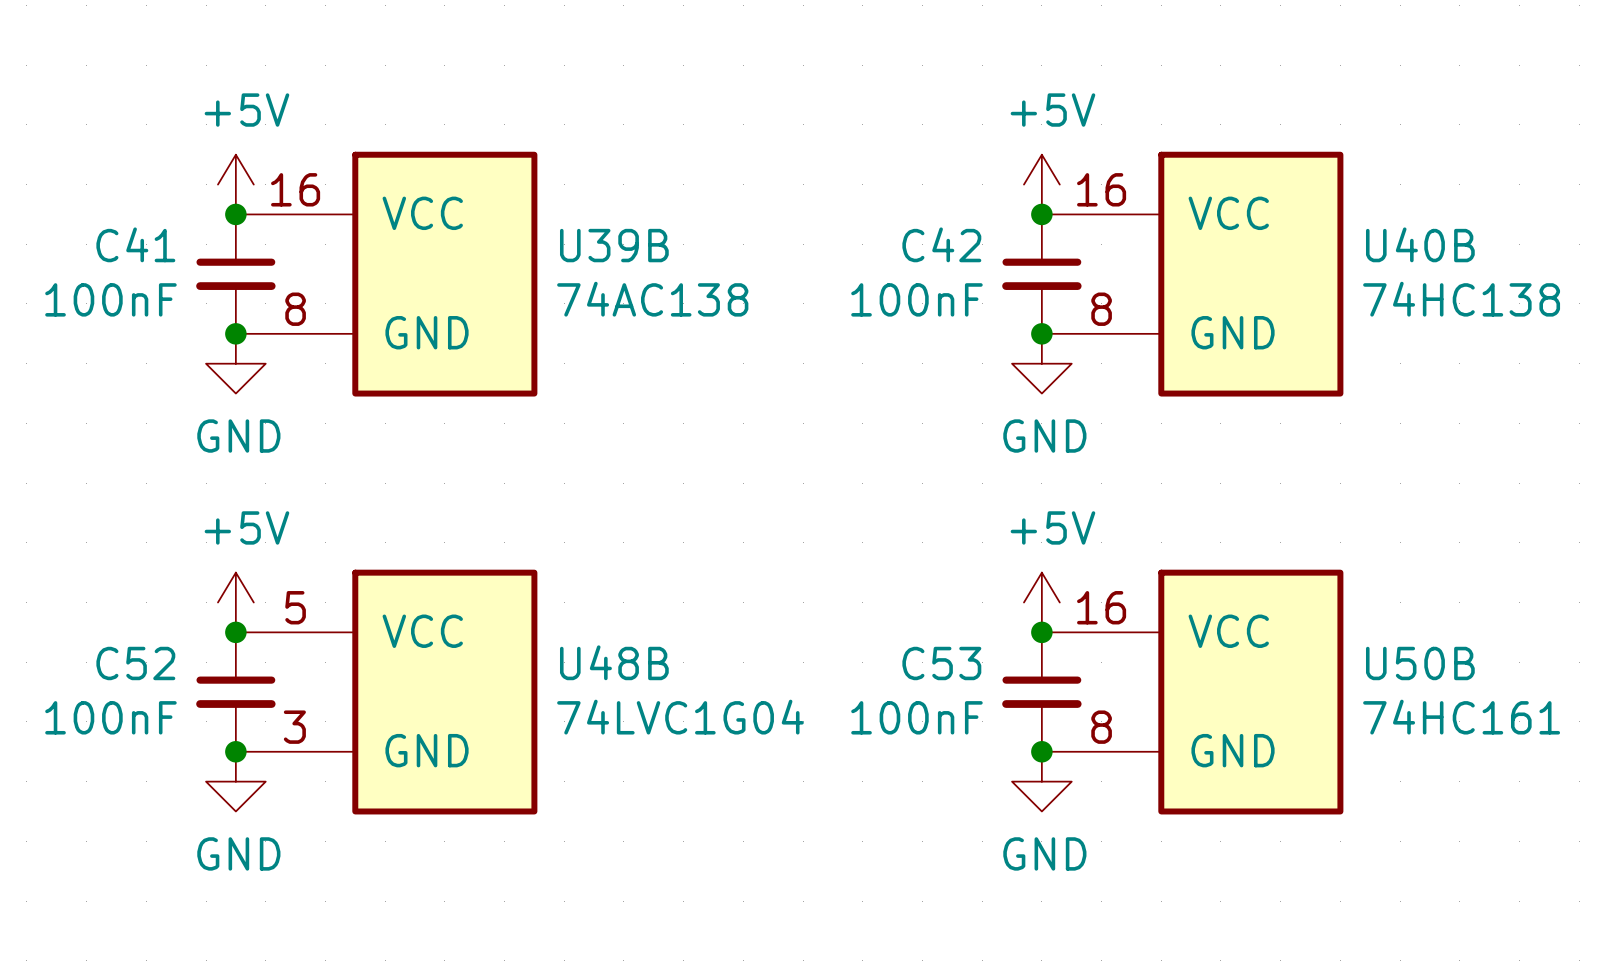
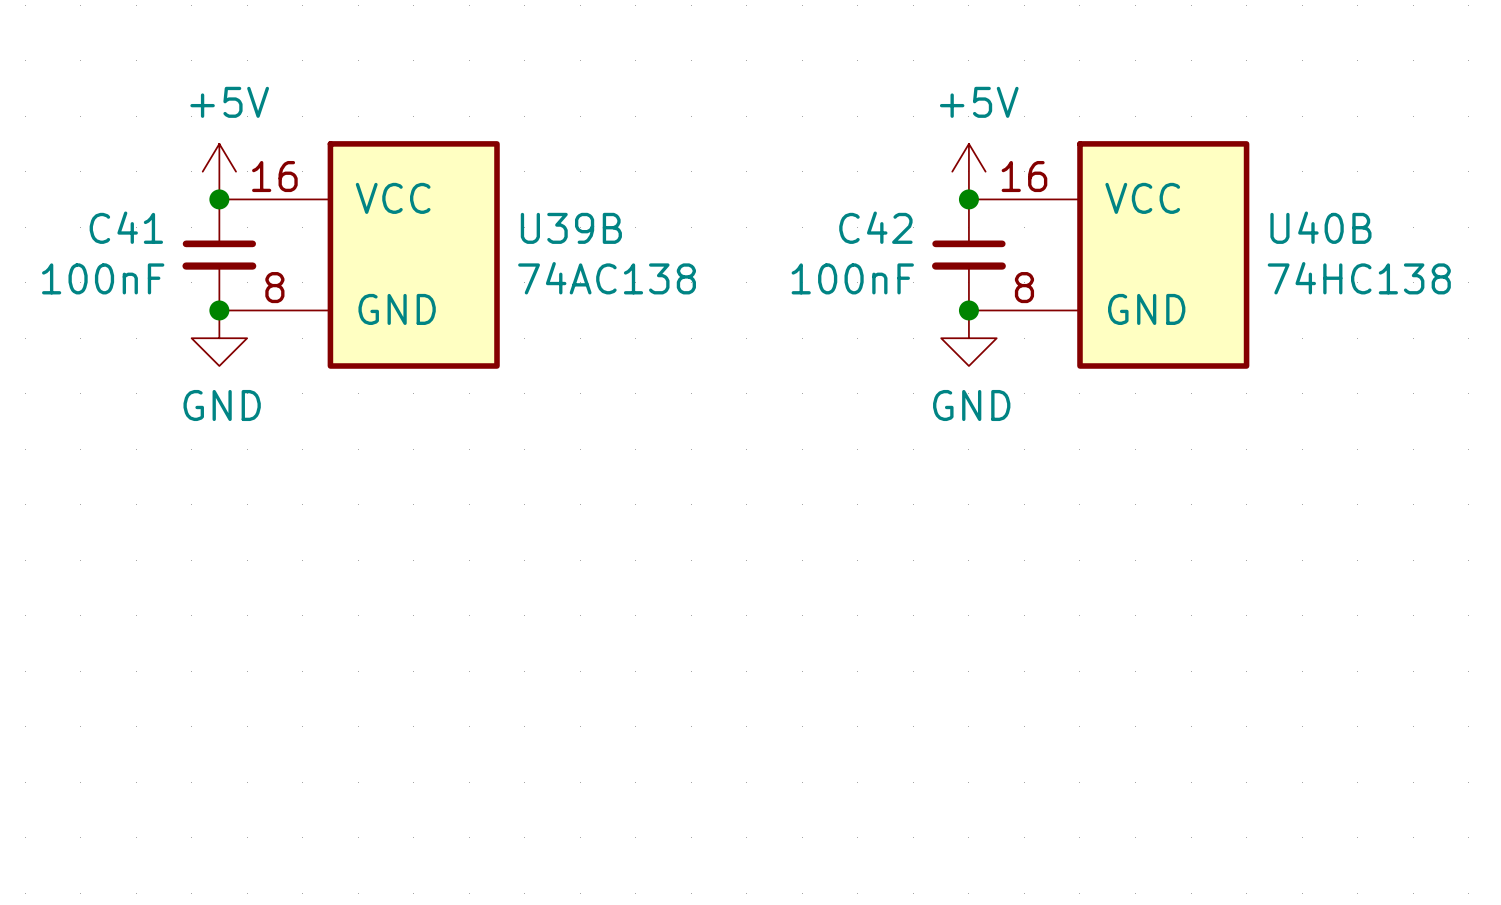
power symbol: +5V (235, 602) -> none
power symbol: +5V (1041, 602) -> none
junction: (235, 632) -> none
junction: (1041, 632) -> none
C52: 100nF (235, 692) -> none
U48B: 74LVC1G04 (386, 692) -> none
C53: 100nF (1041, 692) -> none
U50B: 74HC161 (1192, 692) -> none
junction: (235, 751) -> none
junction: (1041, 751) -> none
power symbol: GND (235, 781) -> none
power symbol: GND (1041, 781) -> none

